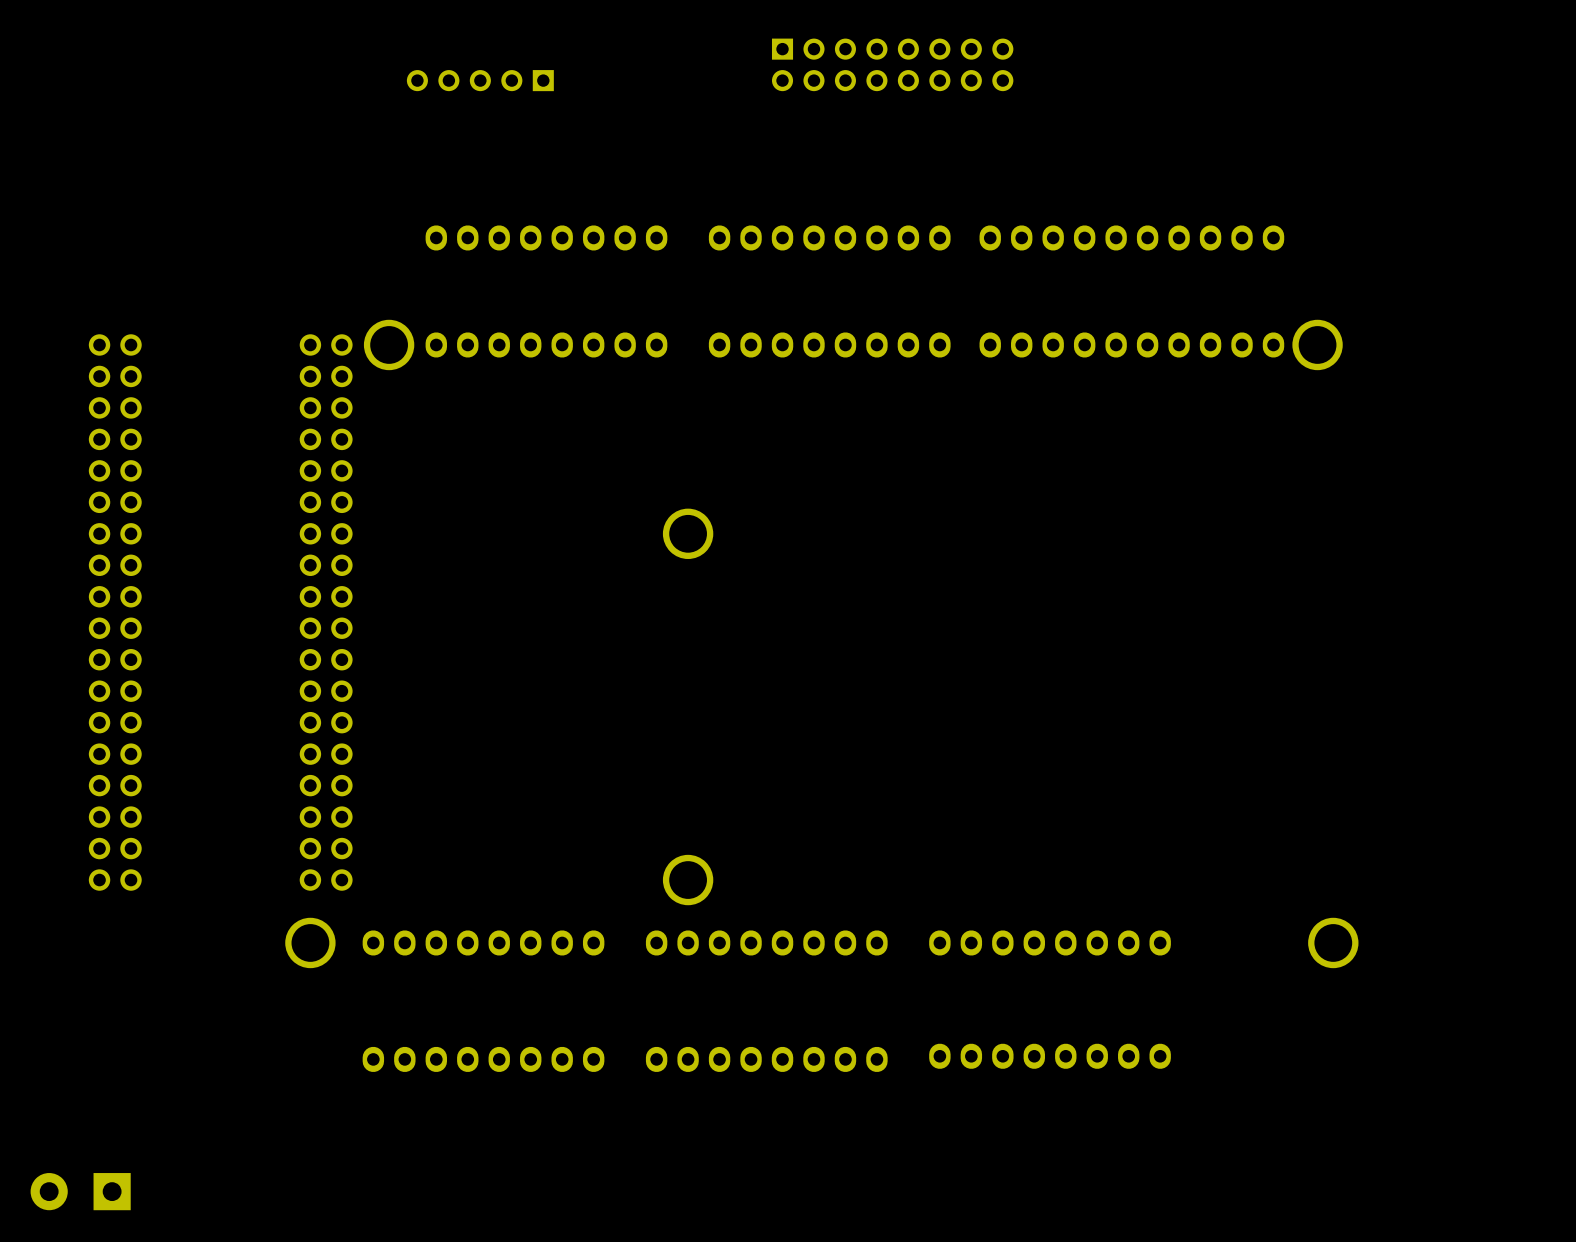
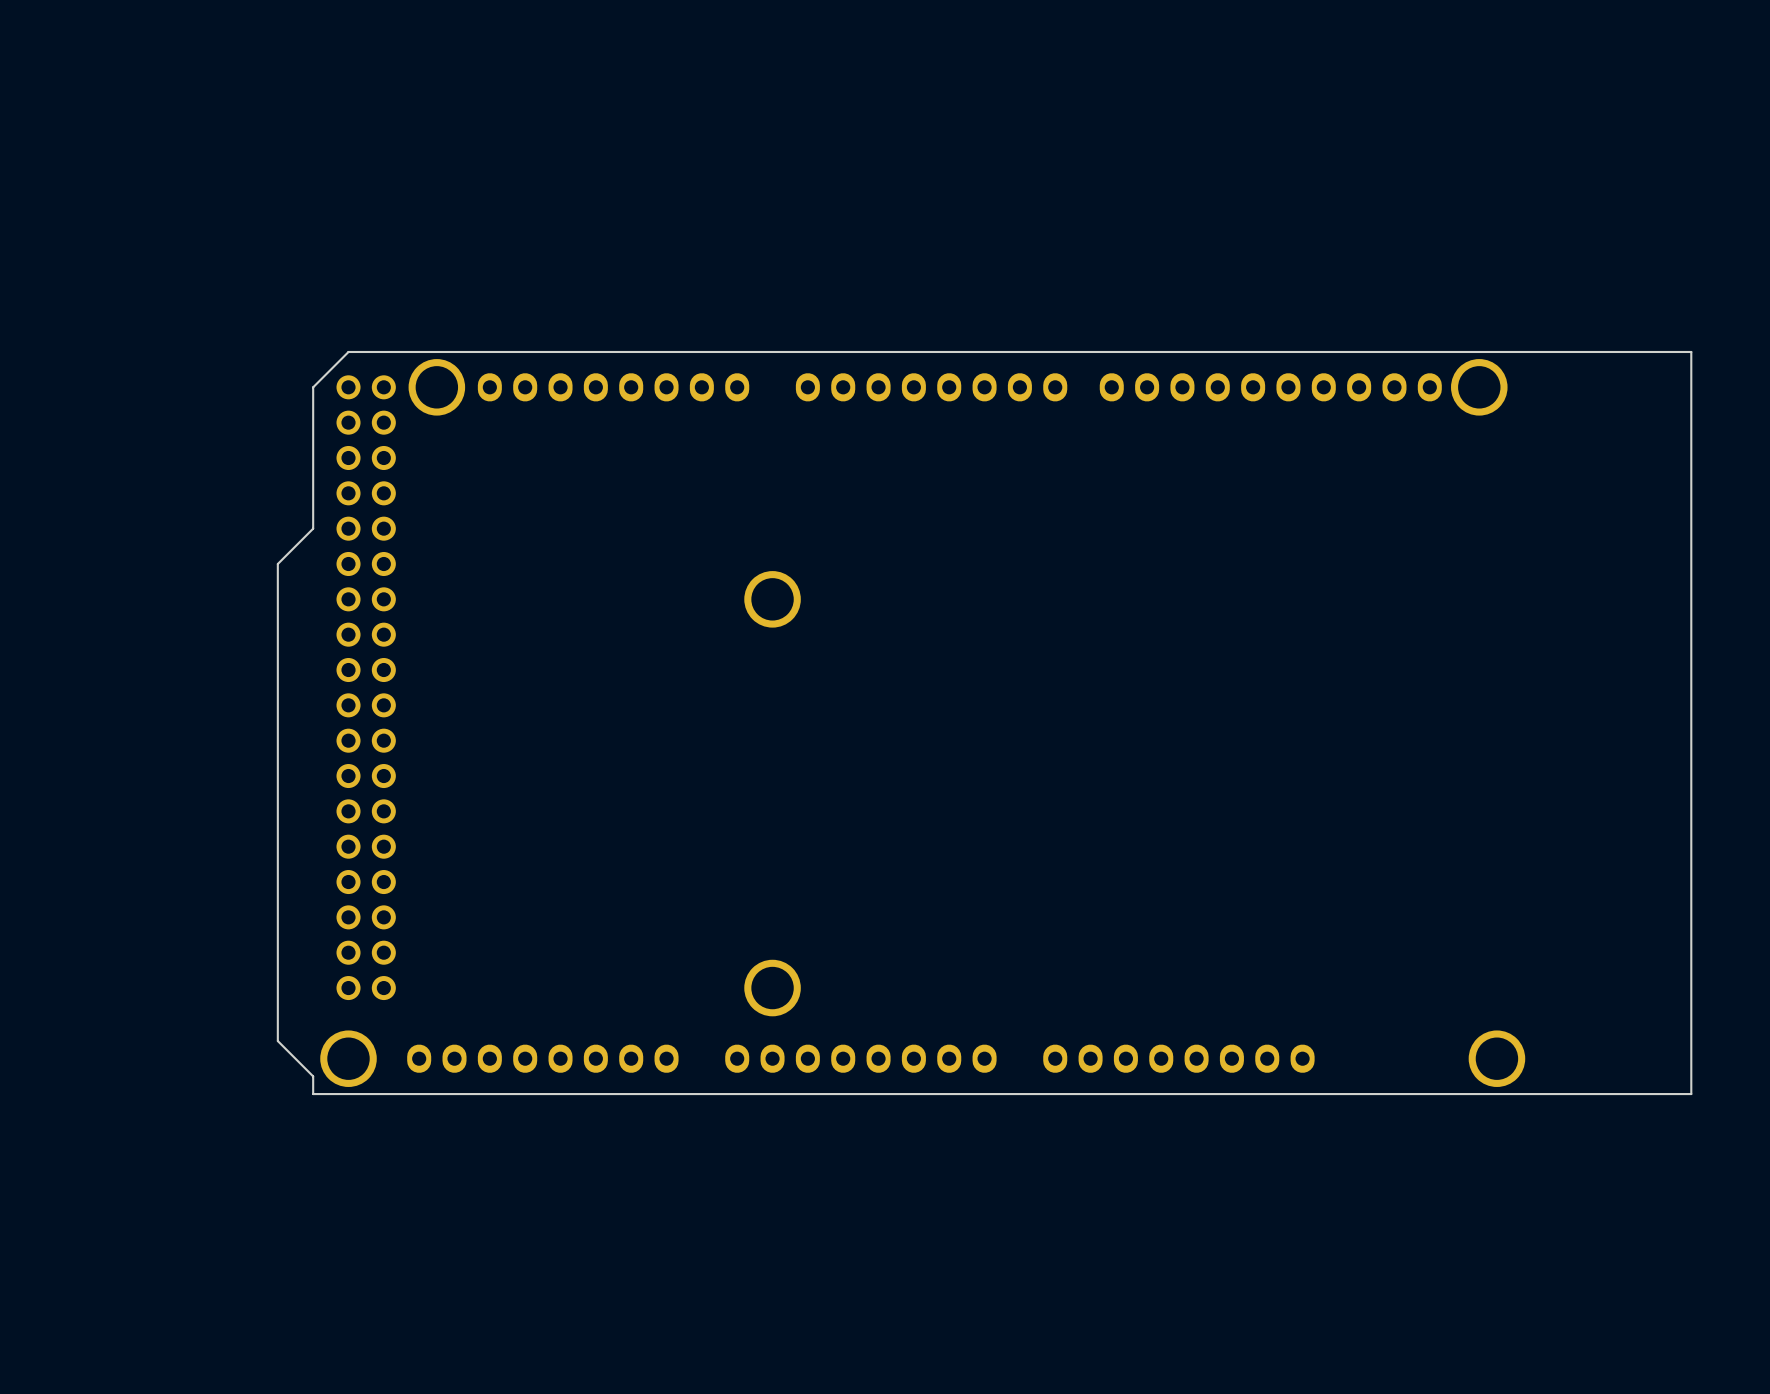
part: (892, 64) -> none
part: (480, 80) -> none
part: (546, 237) -> none
part: (829, 237) -> none
part: (1131, 237) -> none
board edge: none -> (1691, 351) (348, 351) (313, 387) (313, 528) (277, 564) (277, 1041) (313, 1076) (313, 1094) (1691, 1094) (1691, 351)
part: (115, 612) -> none
part: (1050, 1056) -> none
part: (483, 1059) -> none
part: (766, 1059) -> none
part: (80, 1191) -> none

